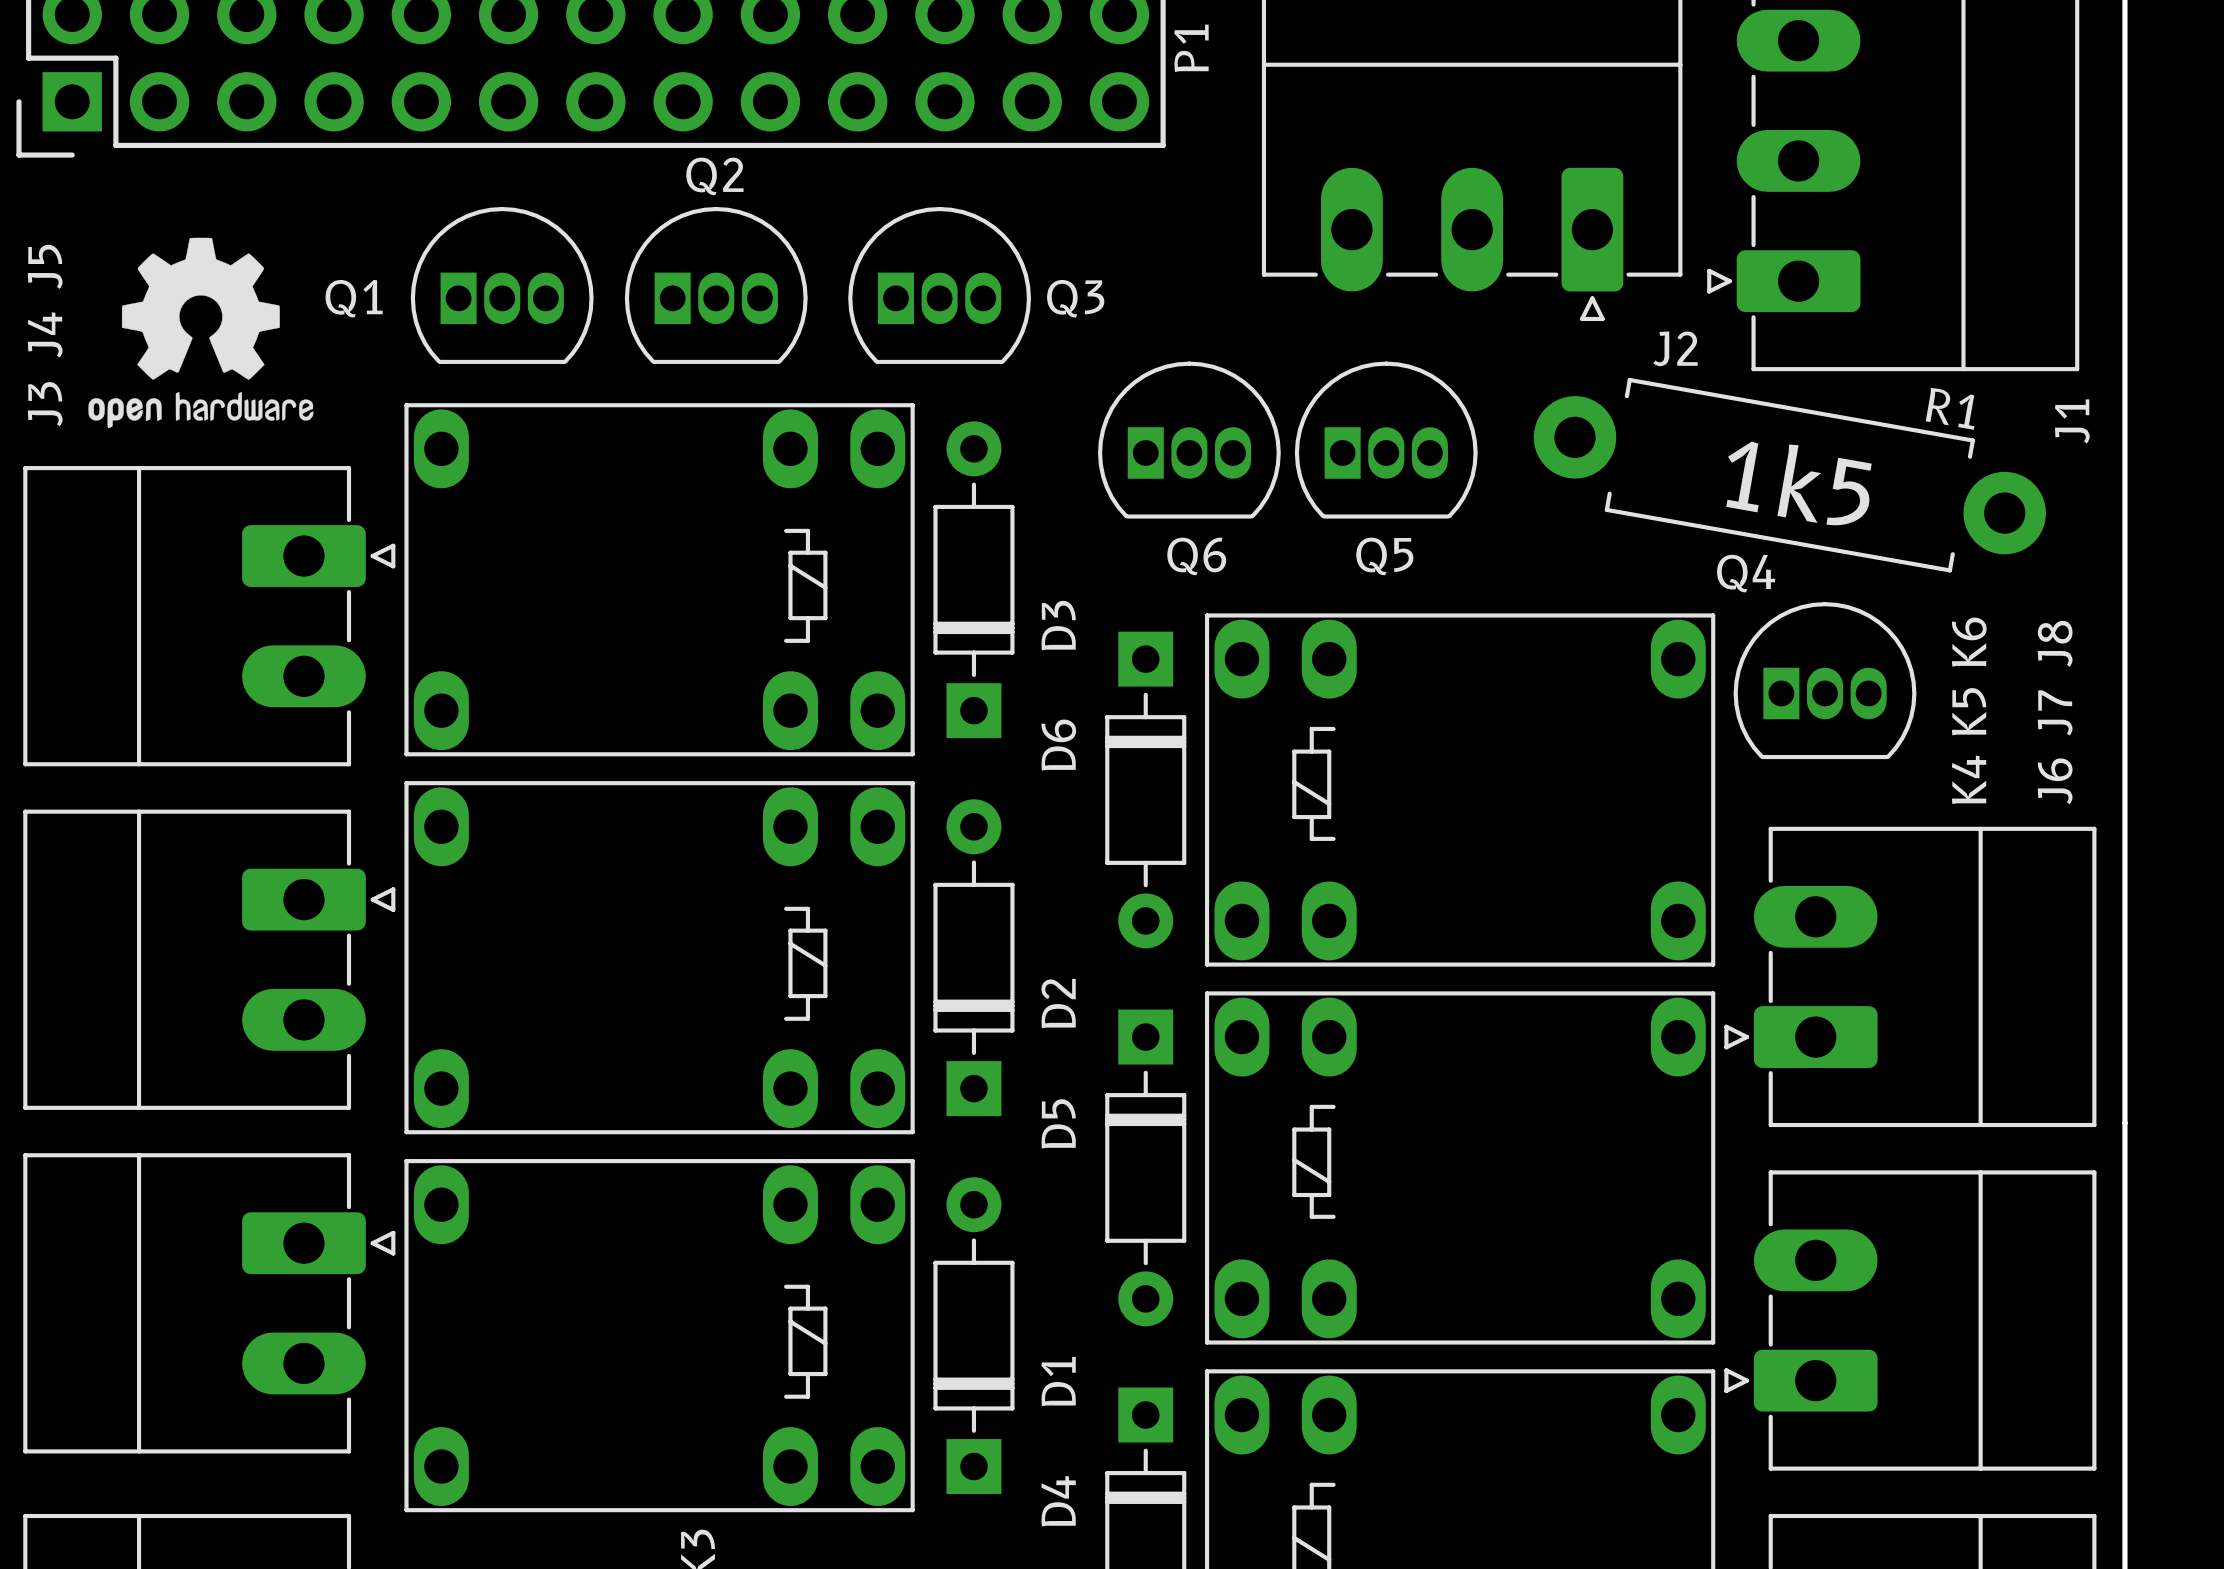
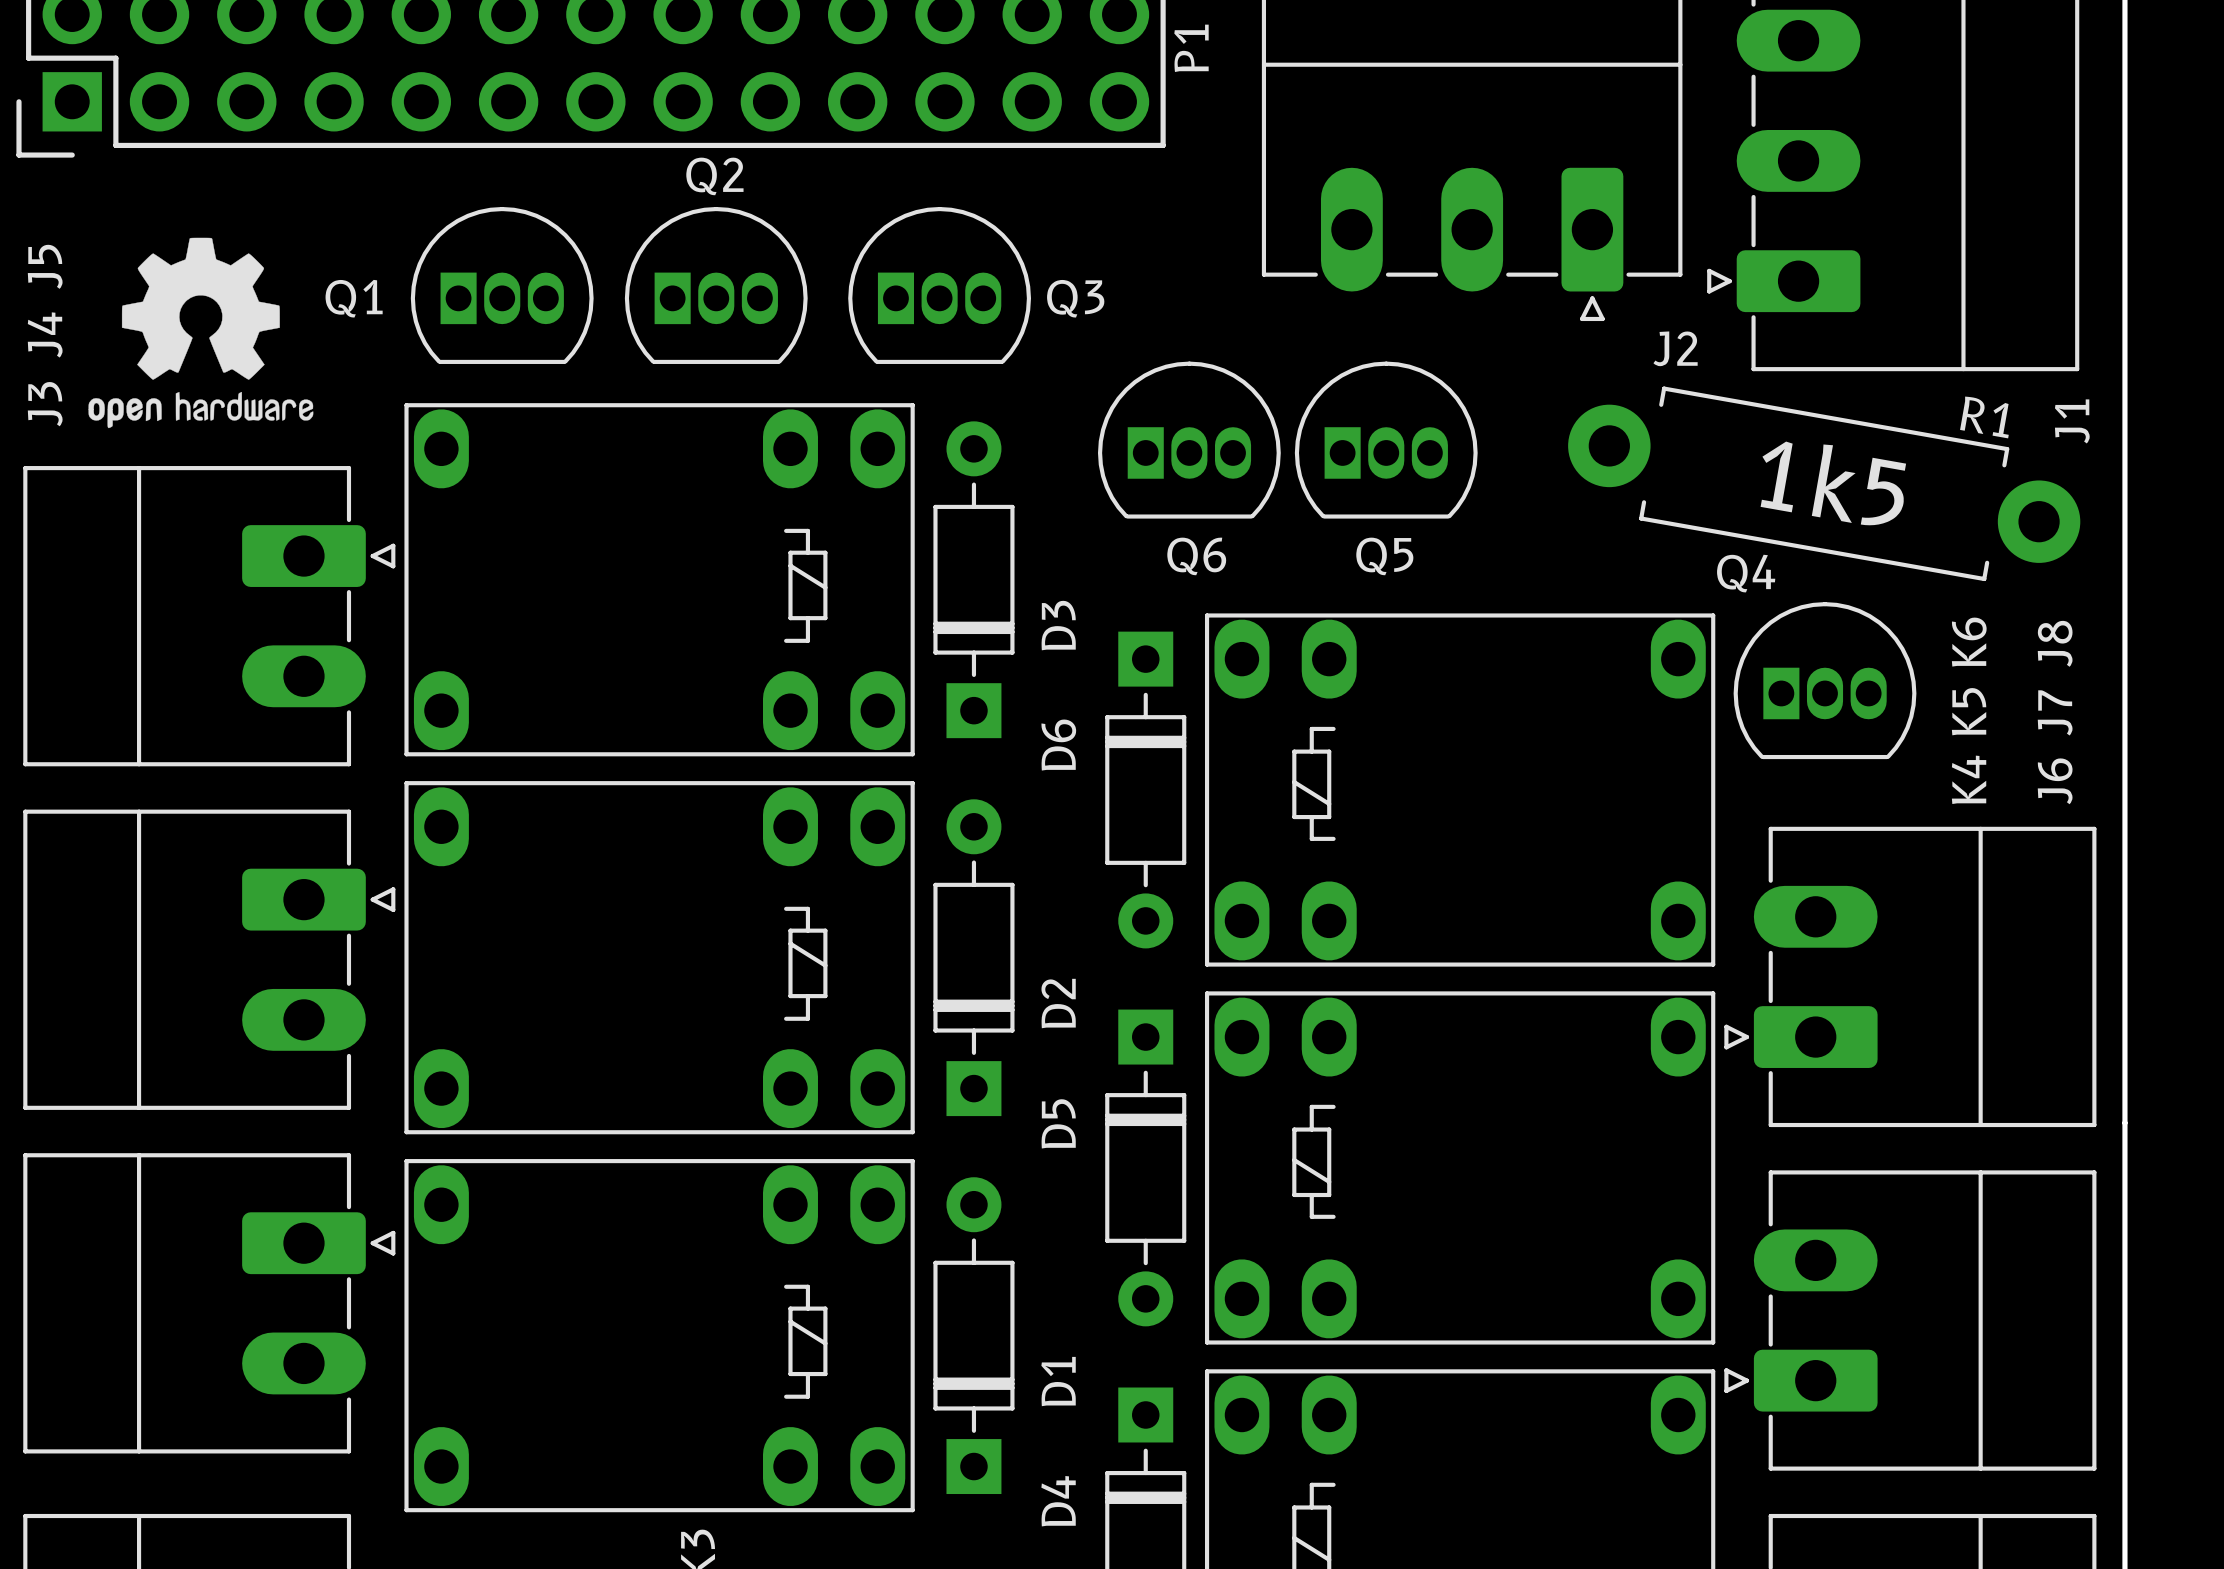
R1 position: (1789, 475) -> (1824, 483)
text position: 1k5 (1798, 483) -> 1k5 (1833, 483)

